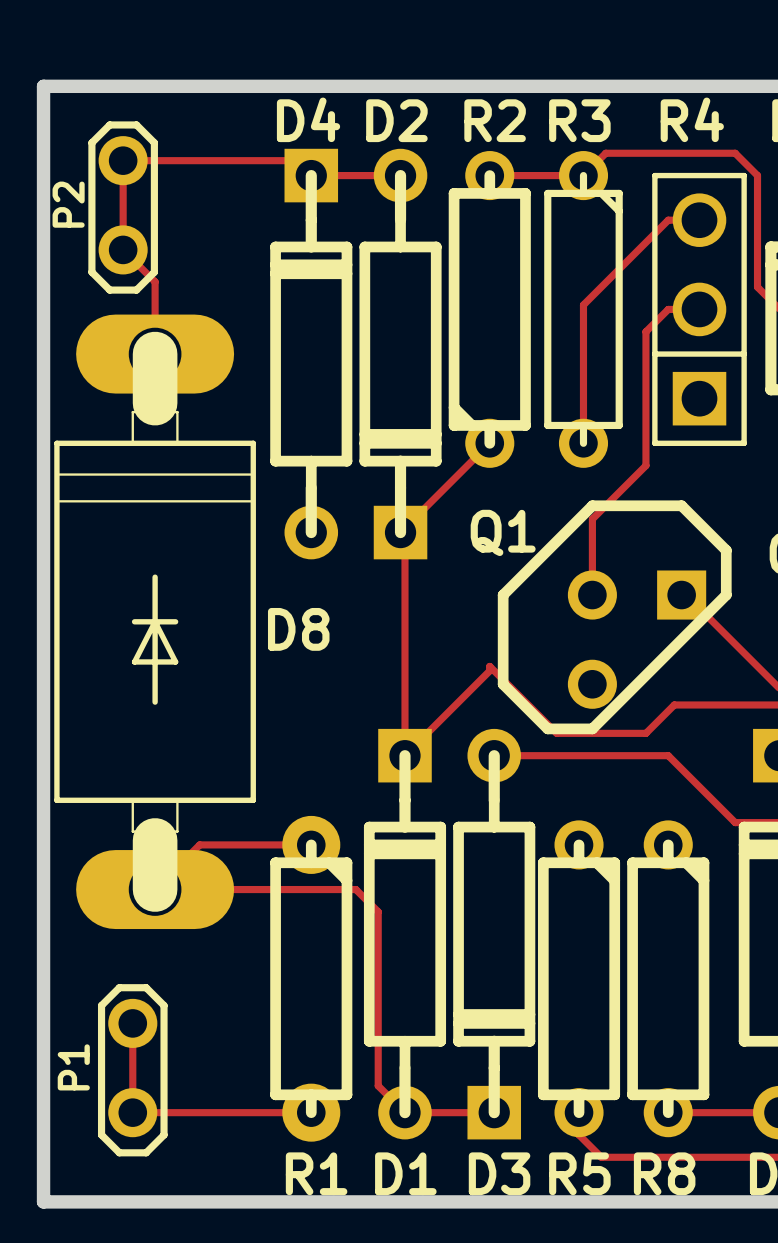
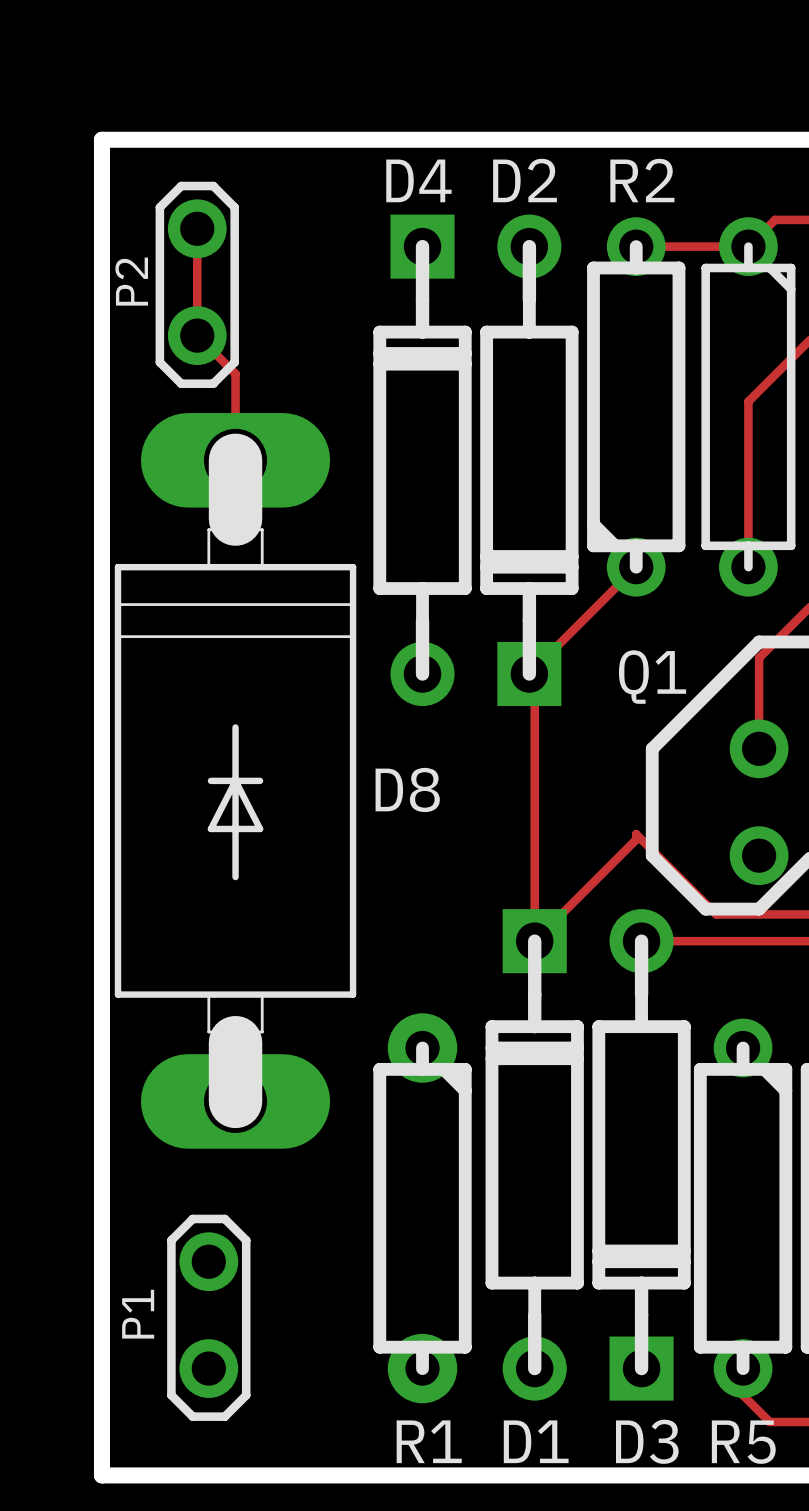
R3 name: R3 (579, 120) -> none
track: (123, 160) (296, 160) (311, 175) (400, 175) -> none
track: (311, 844) (199, 844) (155, 889) (355, 889) (378, 911) (378, 1085) (404, 1112) (494, 1112) -> none
track: (132, 1023) (132, 1112) (311, 1112) -> none

